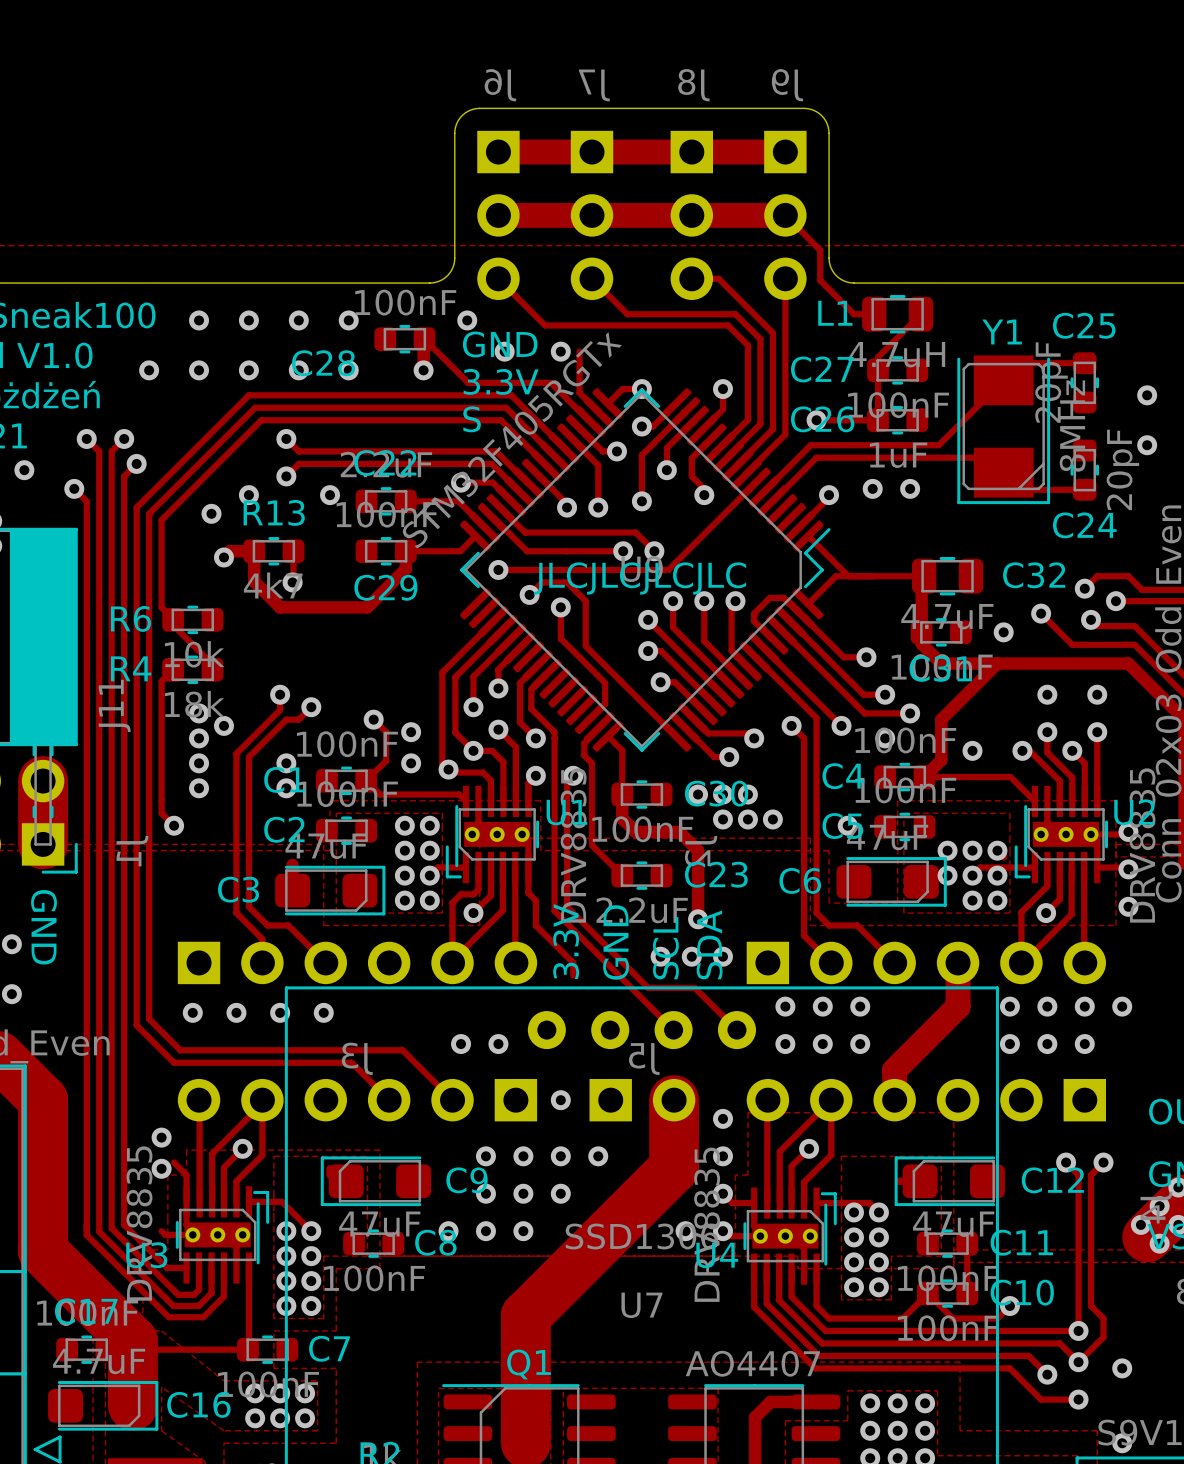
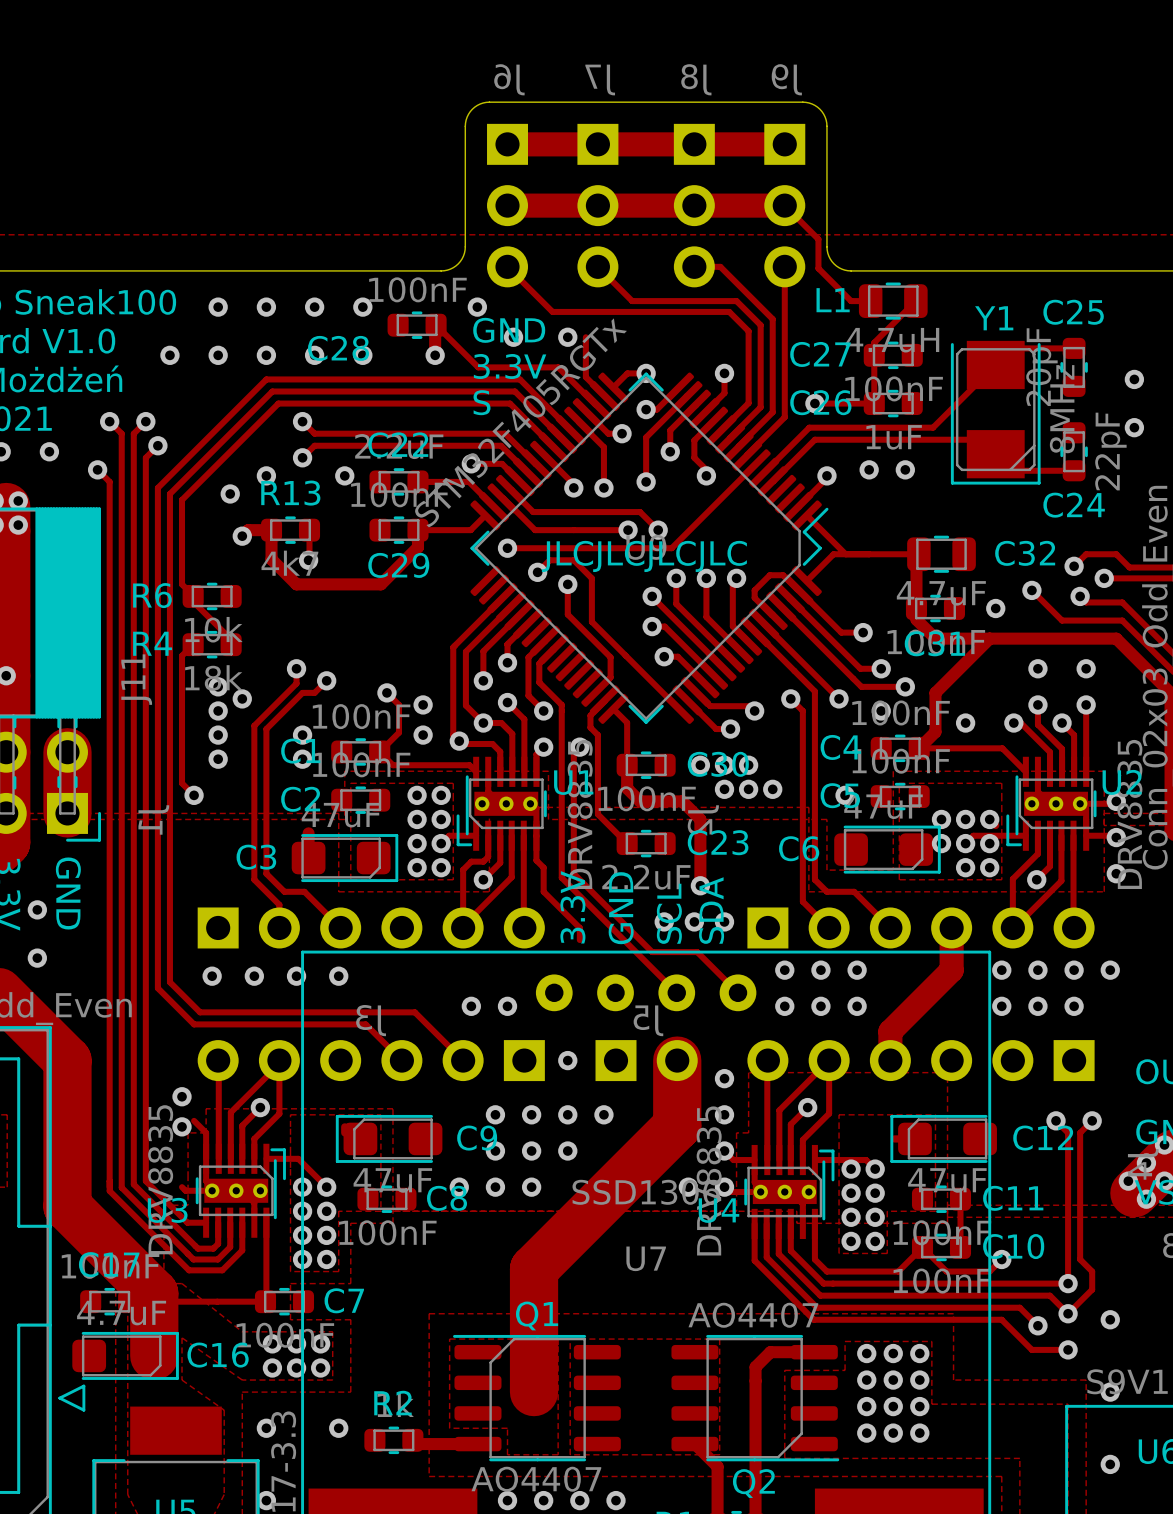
C24 value: 20pF (1122, 469) -> 22pF (1110, 451)

